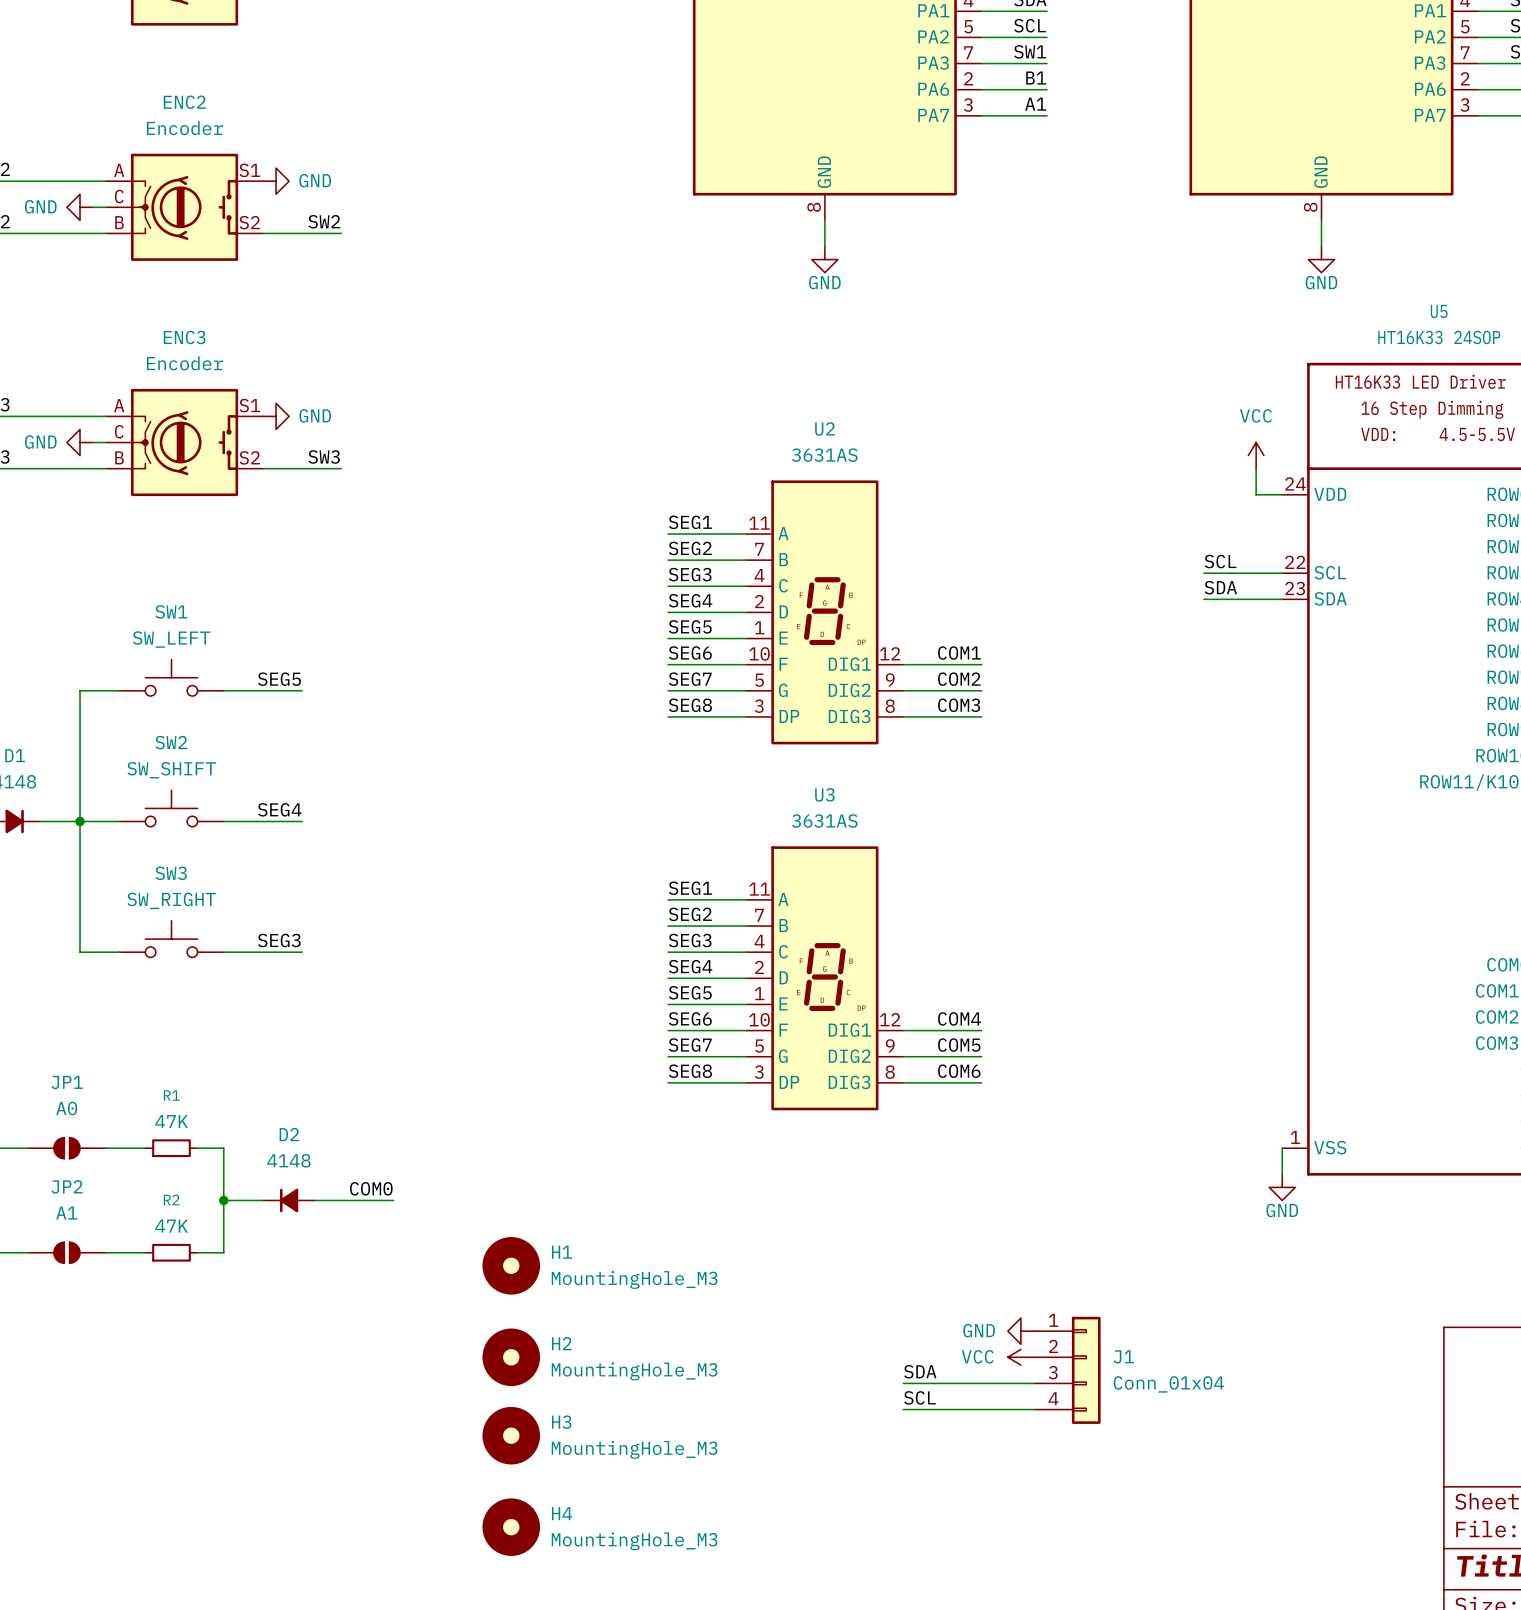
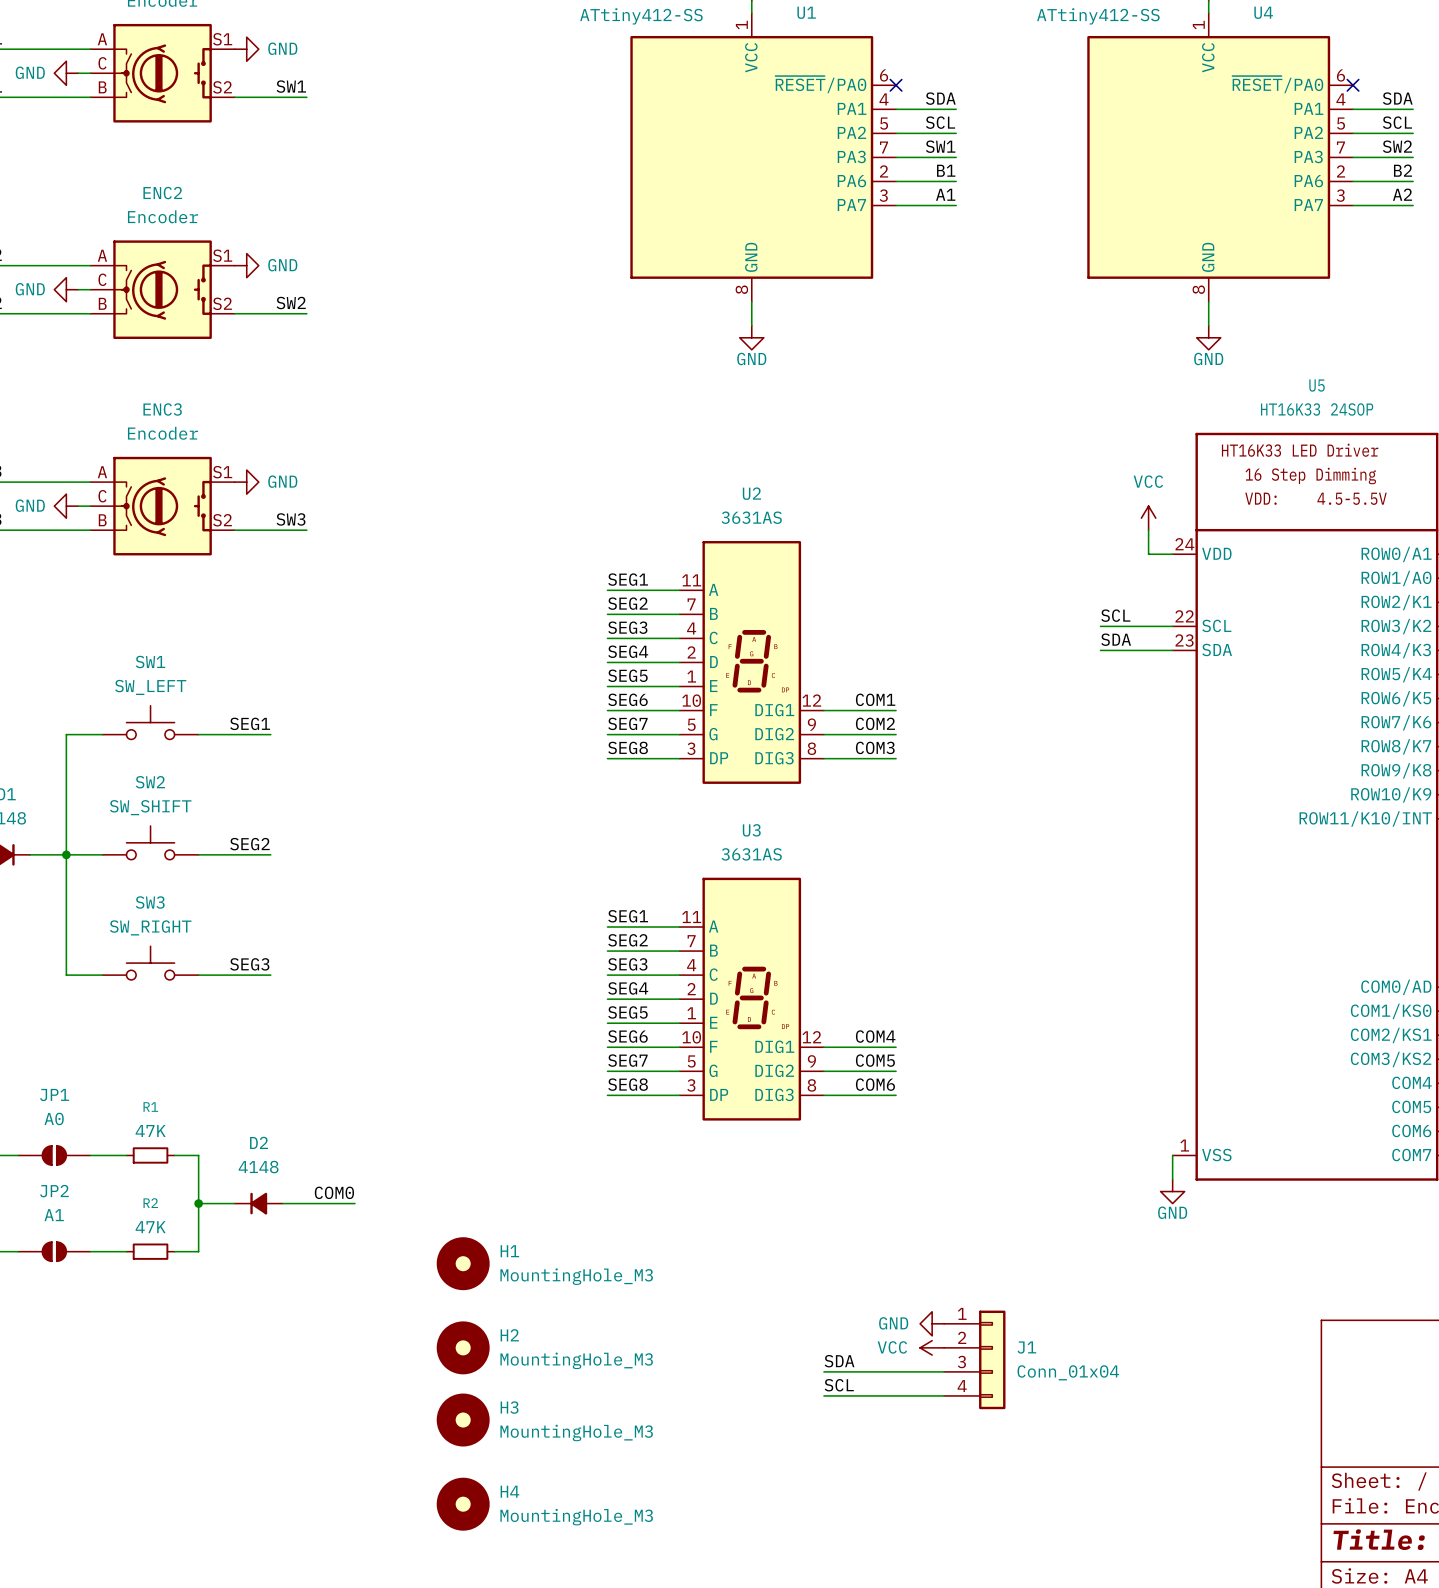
label: SEG5 (279, 679) -> SEG1 (250, 723)
label: SEG4 (279, 809) -> SEG2 (249, 844)

